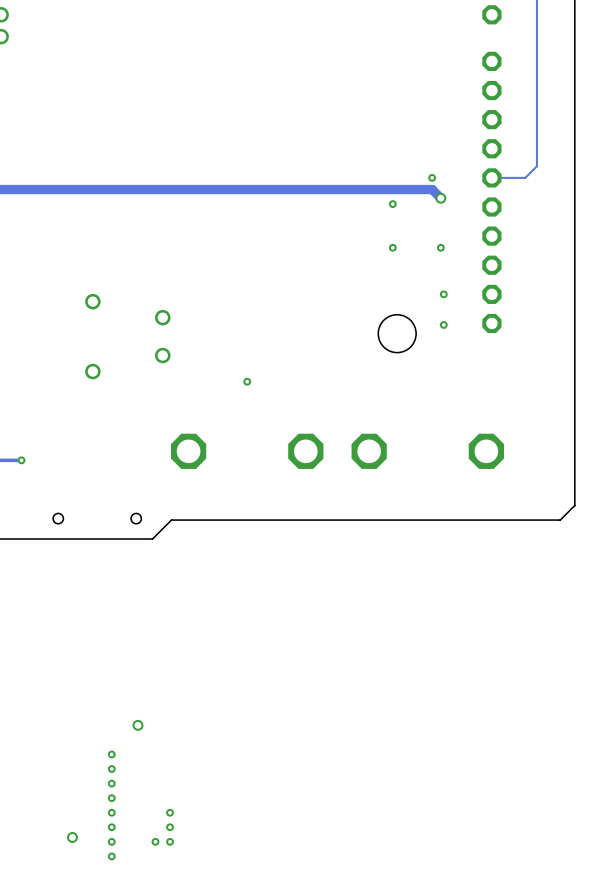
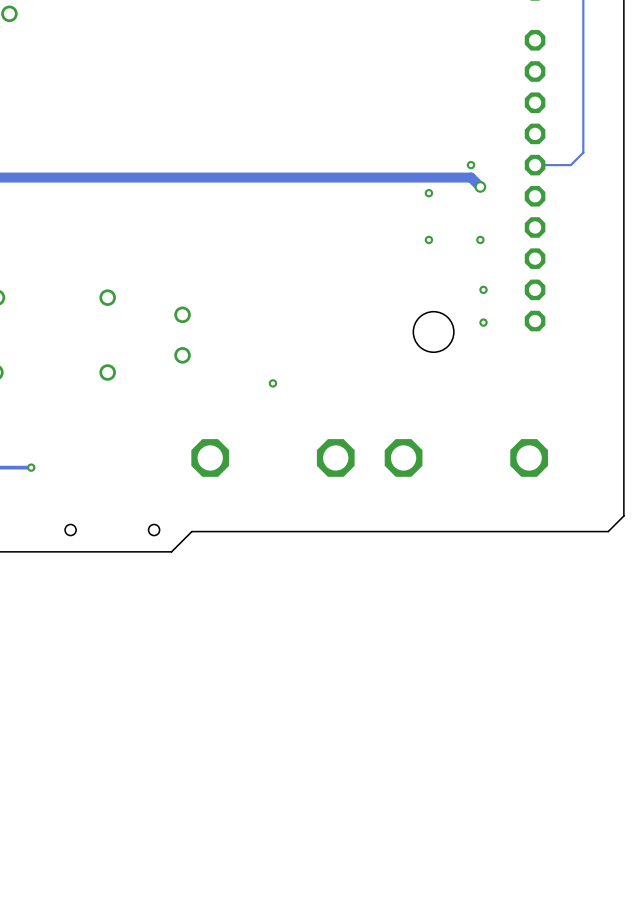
via: (138, 725) -> none
via: (111, 754) -> none
via: (111, 769) -> none
via: (111, 783) -> none
via: (111, 798) -> none
via: (111, 812) -> none
via: (170, 812) -> none
via: (111, 827) -> none
via: (170, 827) -> none
via: (72, 837) -> none
via: (111, 841) -> none
via: (155, 841) -> none
via: (170, 841) -> none
via: (111, 856) -> none

